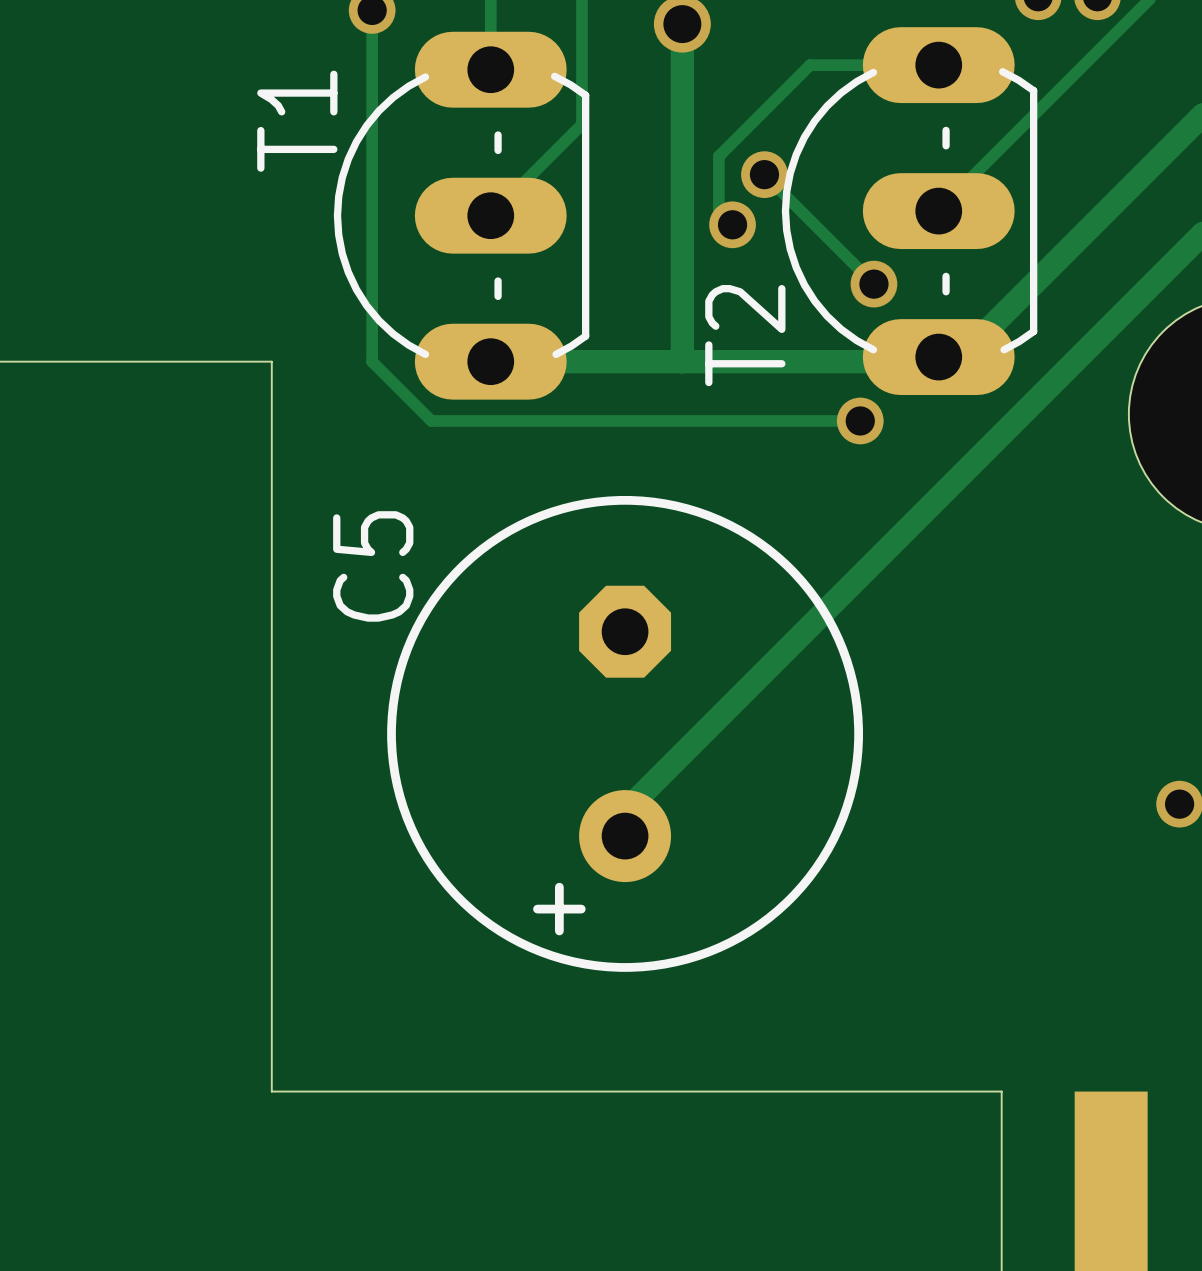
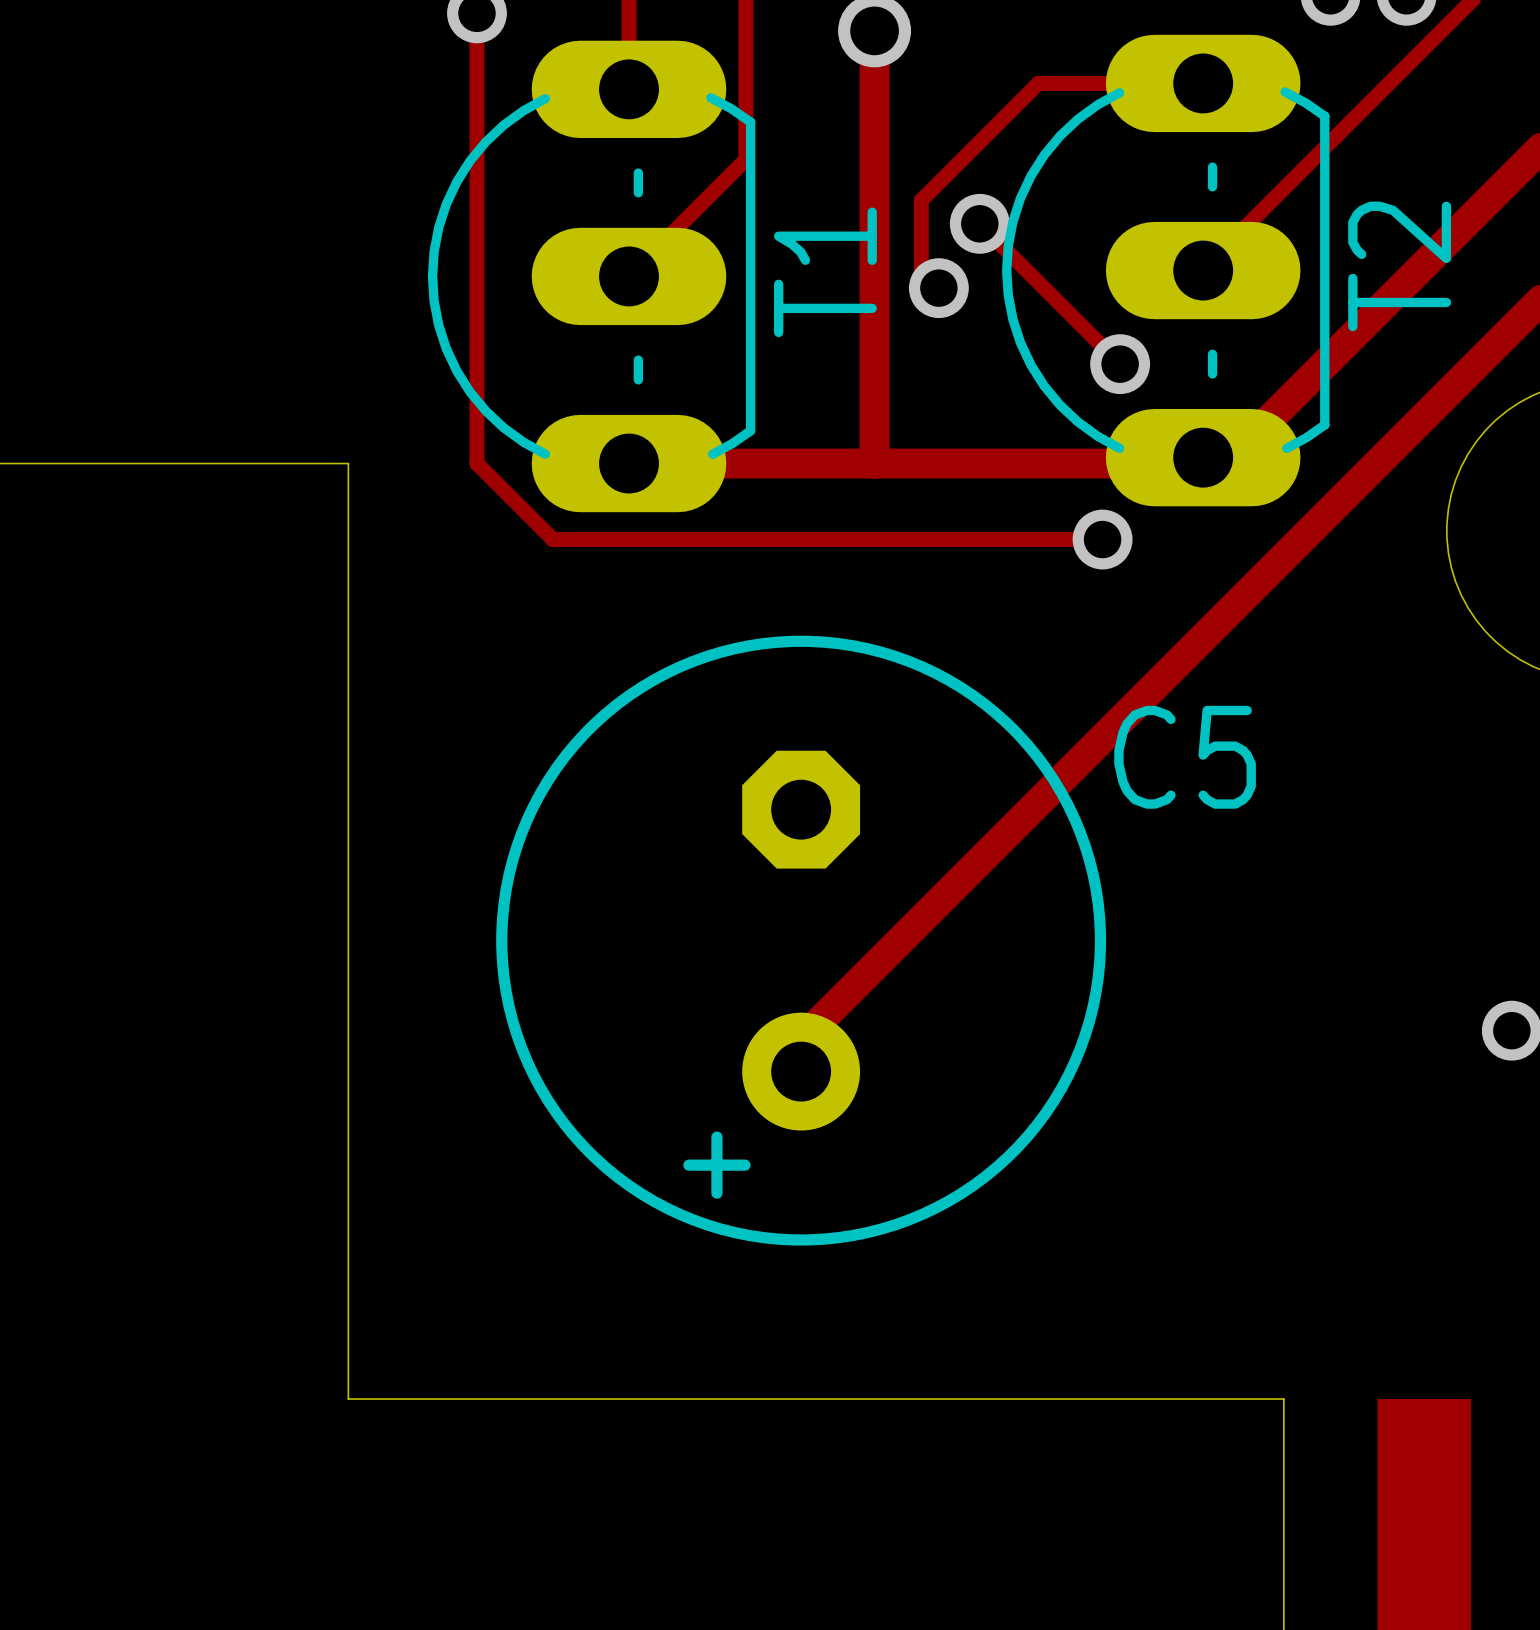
T1 name position: T1 (297, 121) -> T1 (825, 272)
T2 name position: T2 (745, 335) -> T2 (1399, 266)
C5 name rotation: 0° (373, 566) -> 90° clockwise (1185, 757)
C5 name position: C5 (373, 566) -> C5 (1185, 757)

